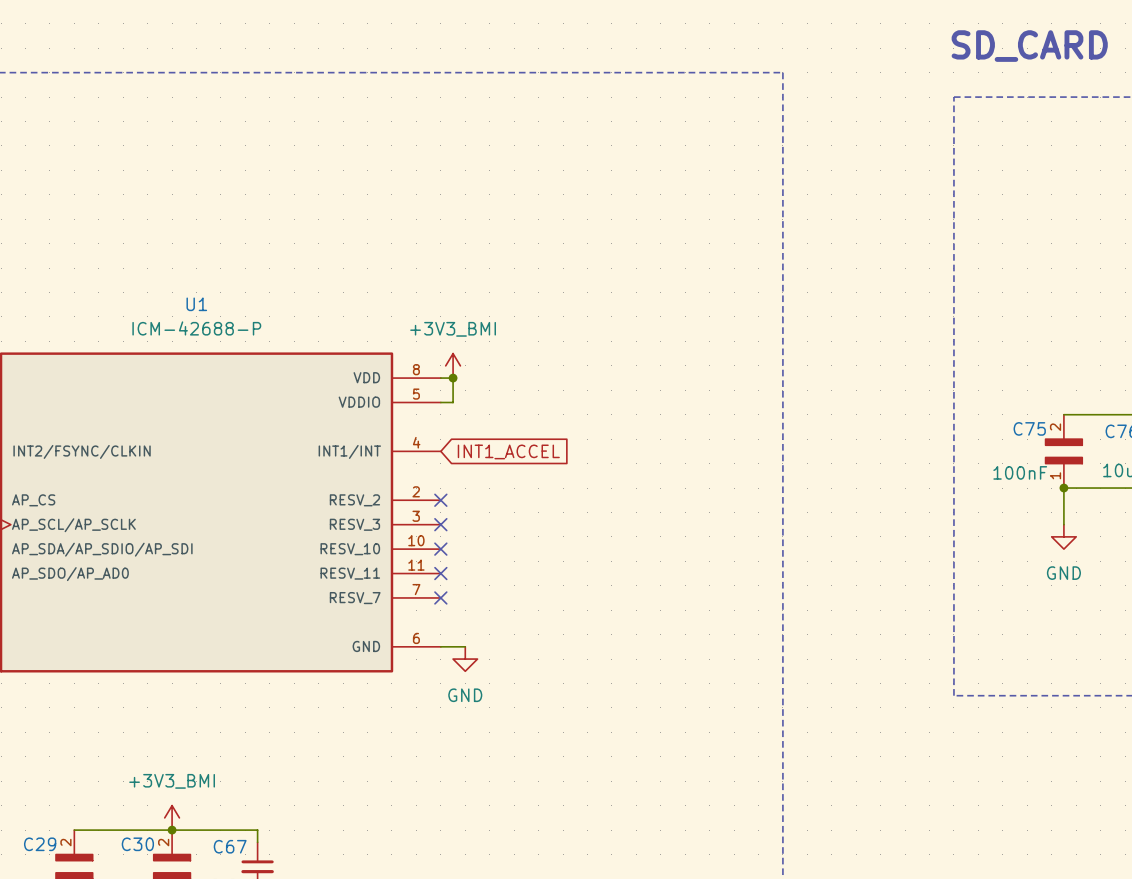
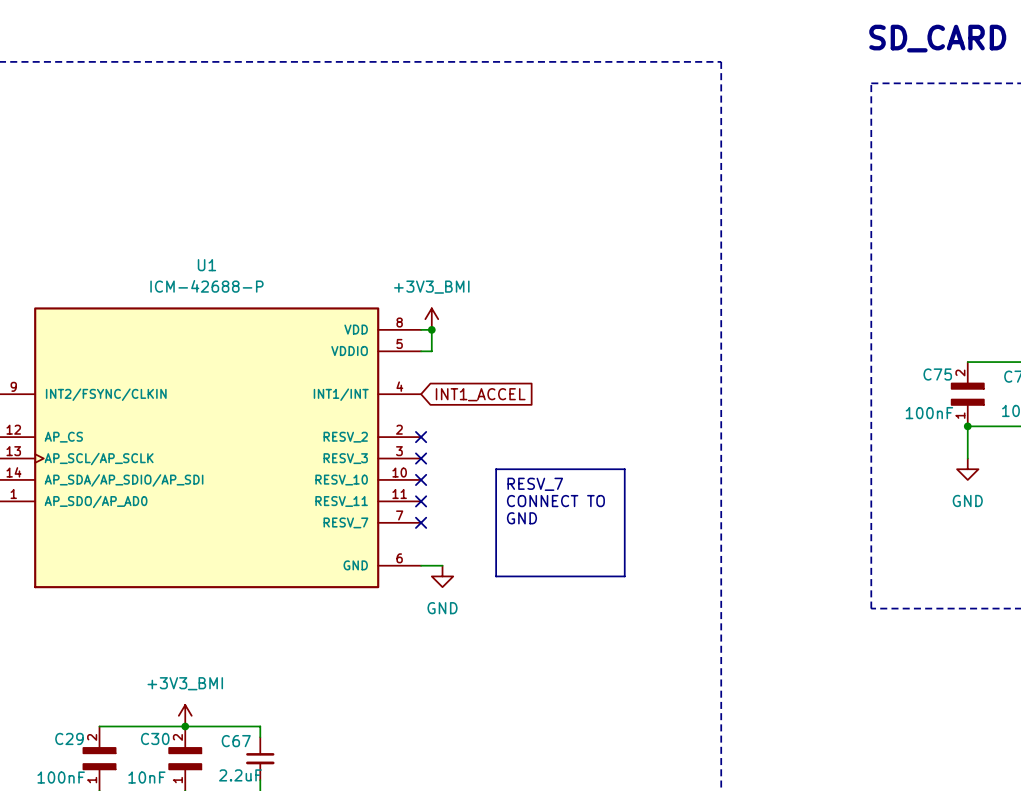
line: none -> (496, 469) (624, 469) (624, 576) (496, 576) (496, 469)
text: none -> RESV_7 (535, 484)
text: none -> CONNECT TO (555, 501)
text: none -> GND (521, 518)

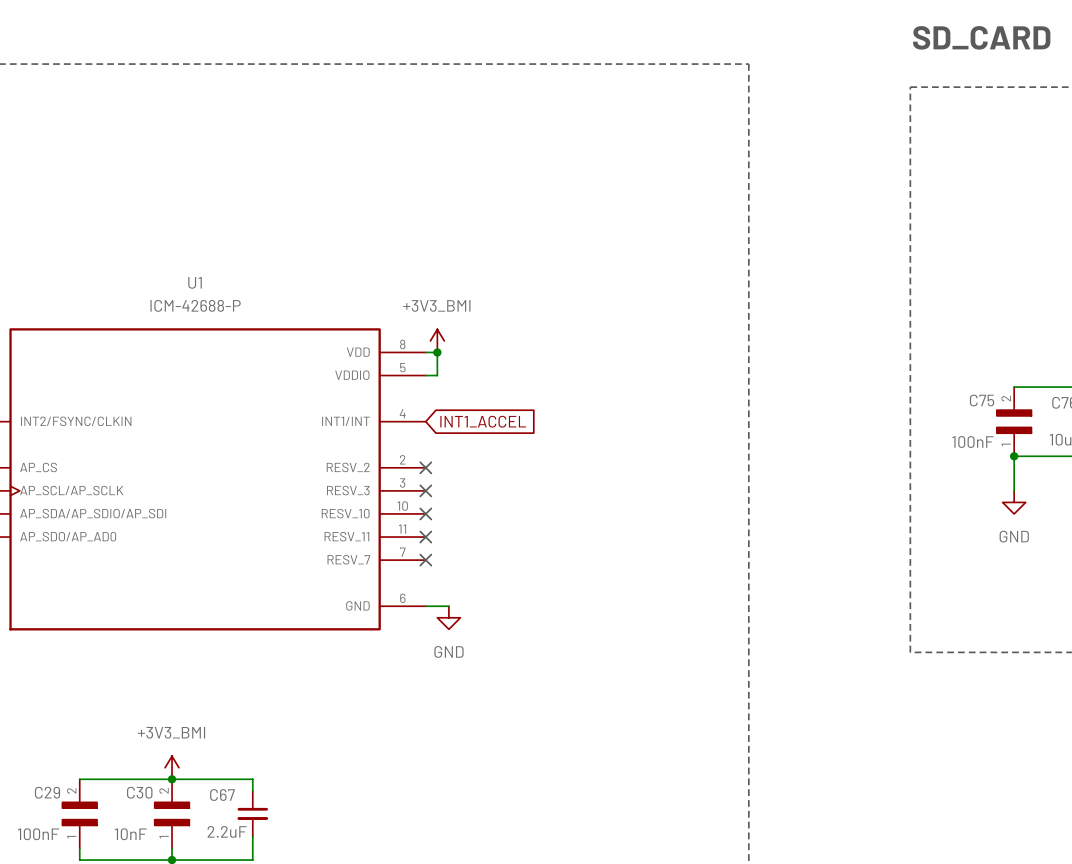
line: (496, 469) (624, 469) (624, 576) (496, 576) (496, 469) -> none
text: RESV_7 (535, 484) -> none
text: CONNECT TO (555, 501) -> none
text: GND (521, 518) -> none

